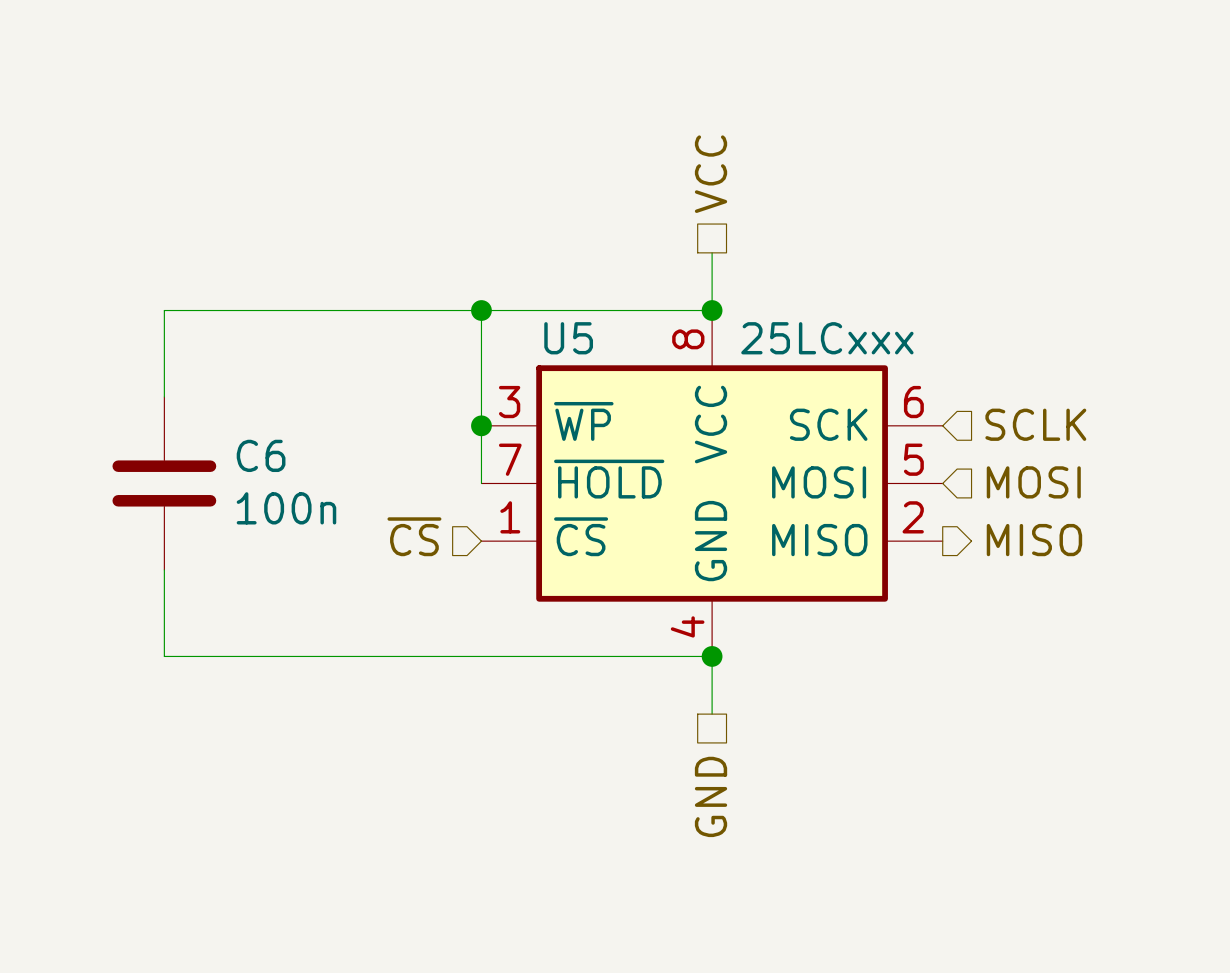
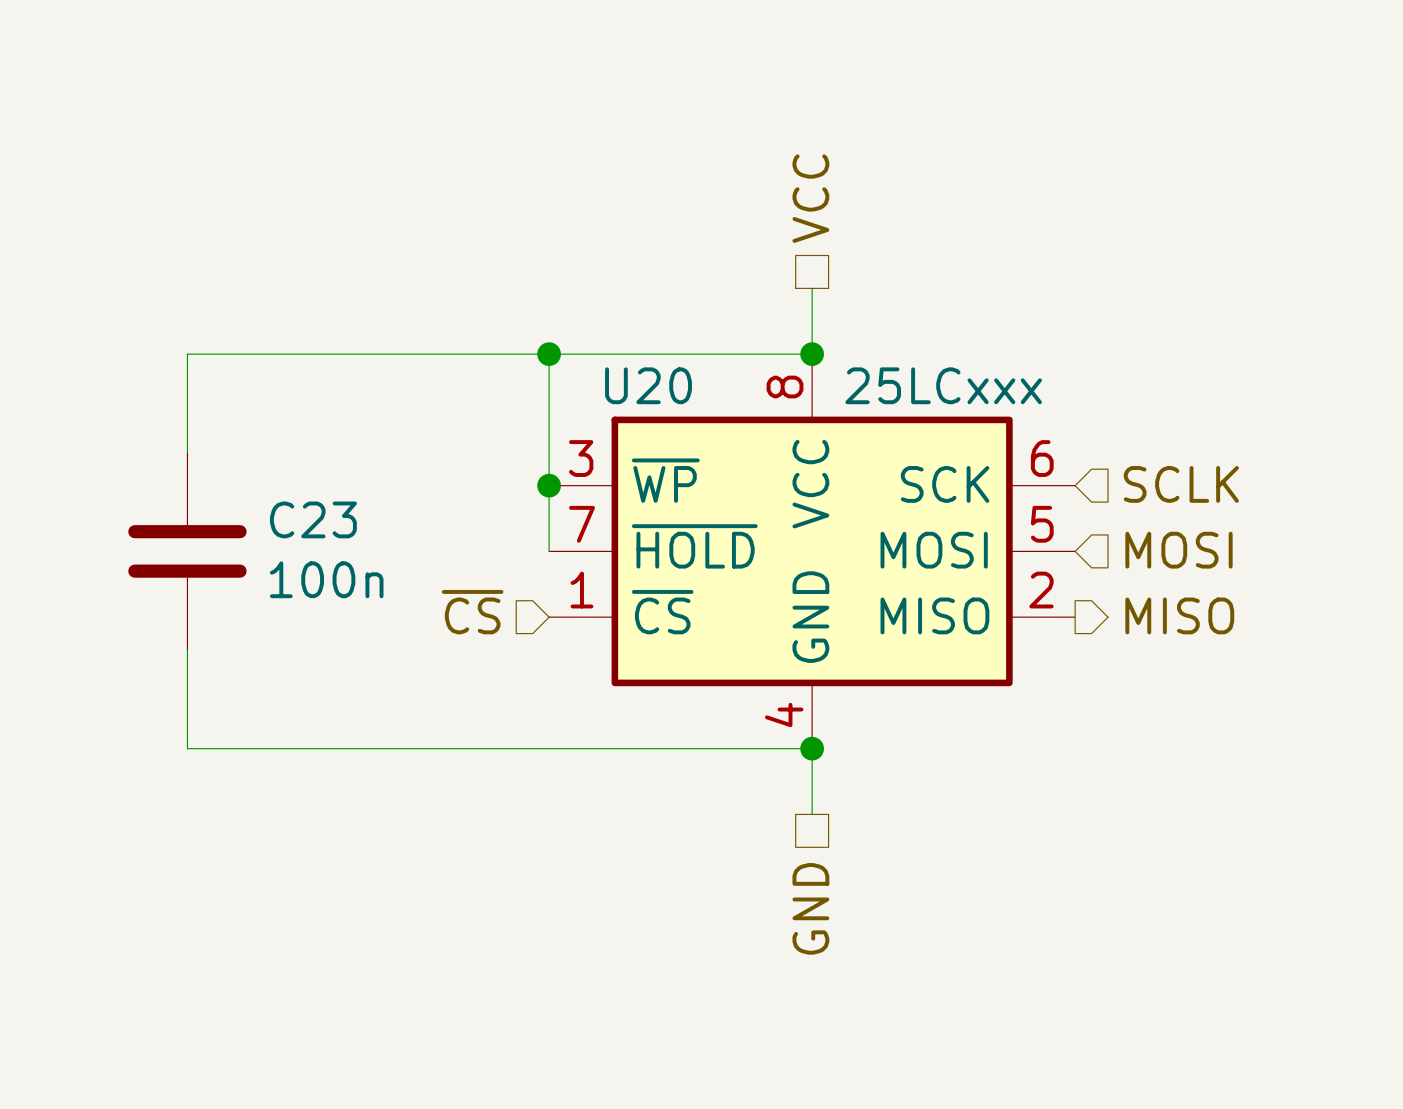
U5 name: U5 (568, 338) -> U20 (648, 385)
C6 name: C6 (261, 455) -> C23 (313, 519)

